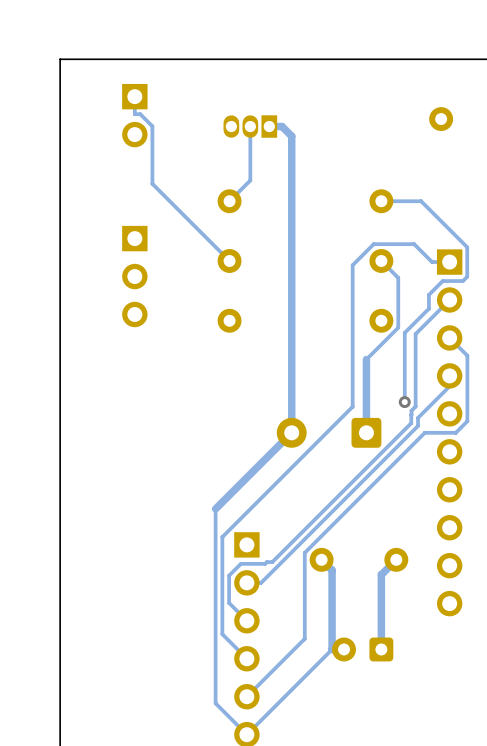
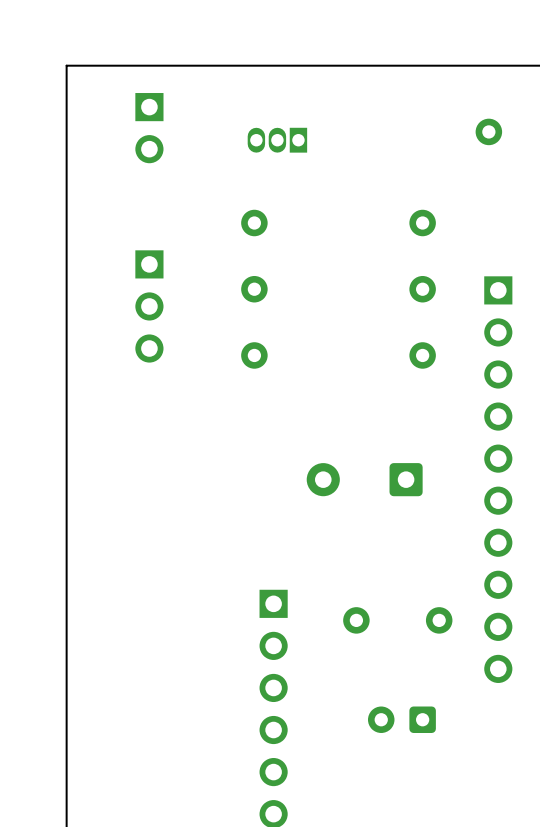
track: (134, 96) (134, 114) (140, 114) (152, 126) (152, 183) (229, 261) -> none
track: (250, 126) (250, 180) (229, 201) -> none
track: (269, 126) (282, 126) (291, 136) (291, 432) (215, 508) (215, 703) (246, 734) (332, 649) -> none
track: (381, 201) (421, 201) (467, 247) (467, 276) (462, 281) (442, 281) (428, 294) (428, 308) (404, 332) (404, 402) -> none
track: (381, 261) (398, 277) (398, 327) (366, 359) (366, 432) -> none
track: (449, 262) (432, 262) (414, 244) (373, 244) (352, 265) (352, 406) (222, 537) (222, 634) (246, 658) -> none
track: (449, 299) (415, 334) (415, 406) (411, 410) (411, 423) (272, 562) (240, 563) (229, 575) (229, 603) (246, 620) -> none
track: (449, 337) (467, 355) (467, 421) (455, 432) (424, 432) (304, 552) (304, 638) (246, 696) -> none
track: (449, 375) (449, 386) (418, 417) (418, 425) (261, 582) (246, 582) -> none
via: (404, 402) -> none
track: (321, 559) (332, 570) (332, 649) -> none
track: (396, 559) (381, 574) (381, 649) -> none

